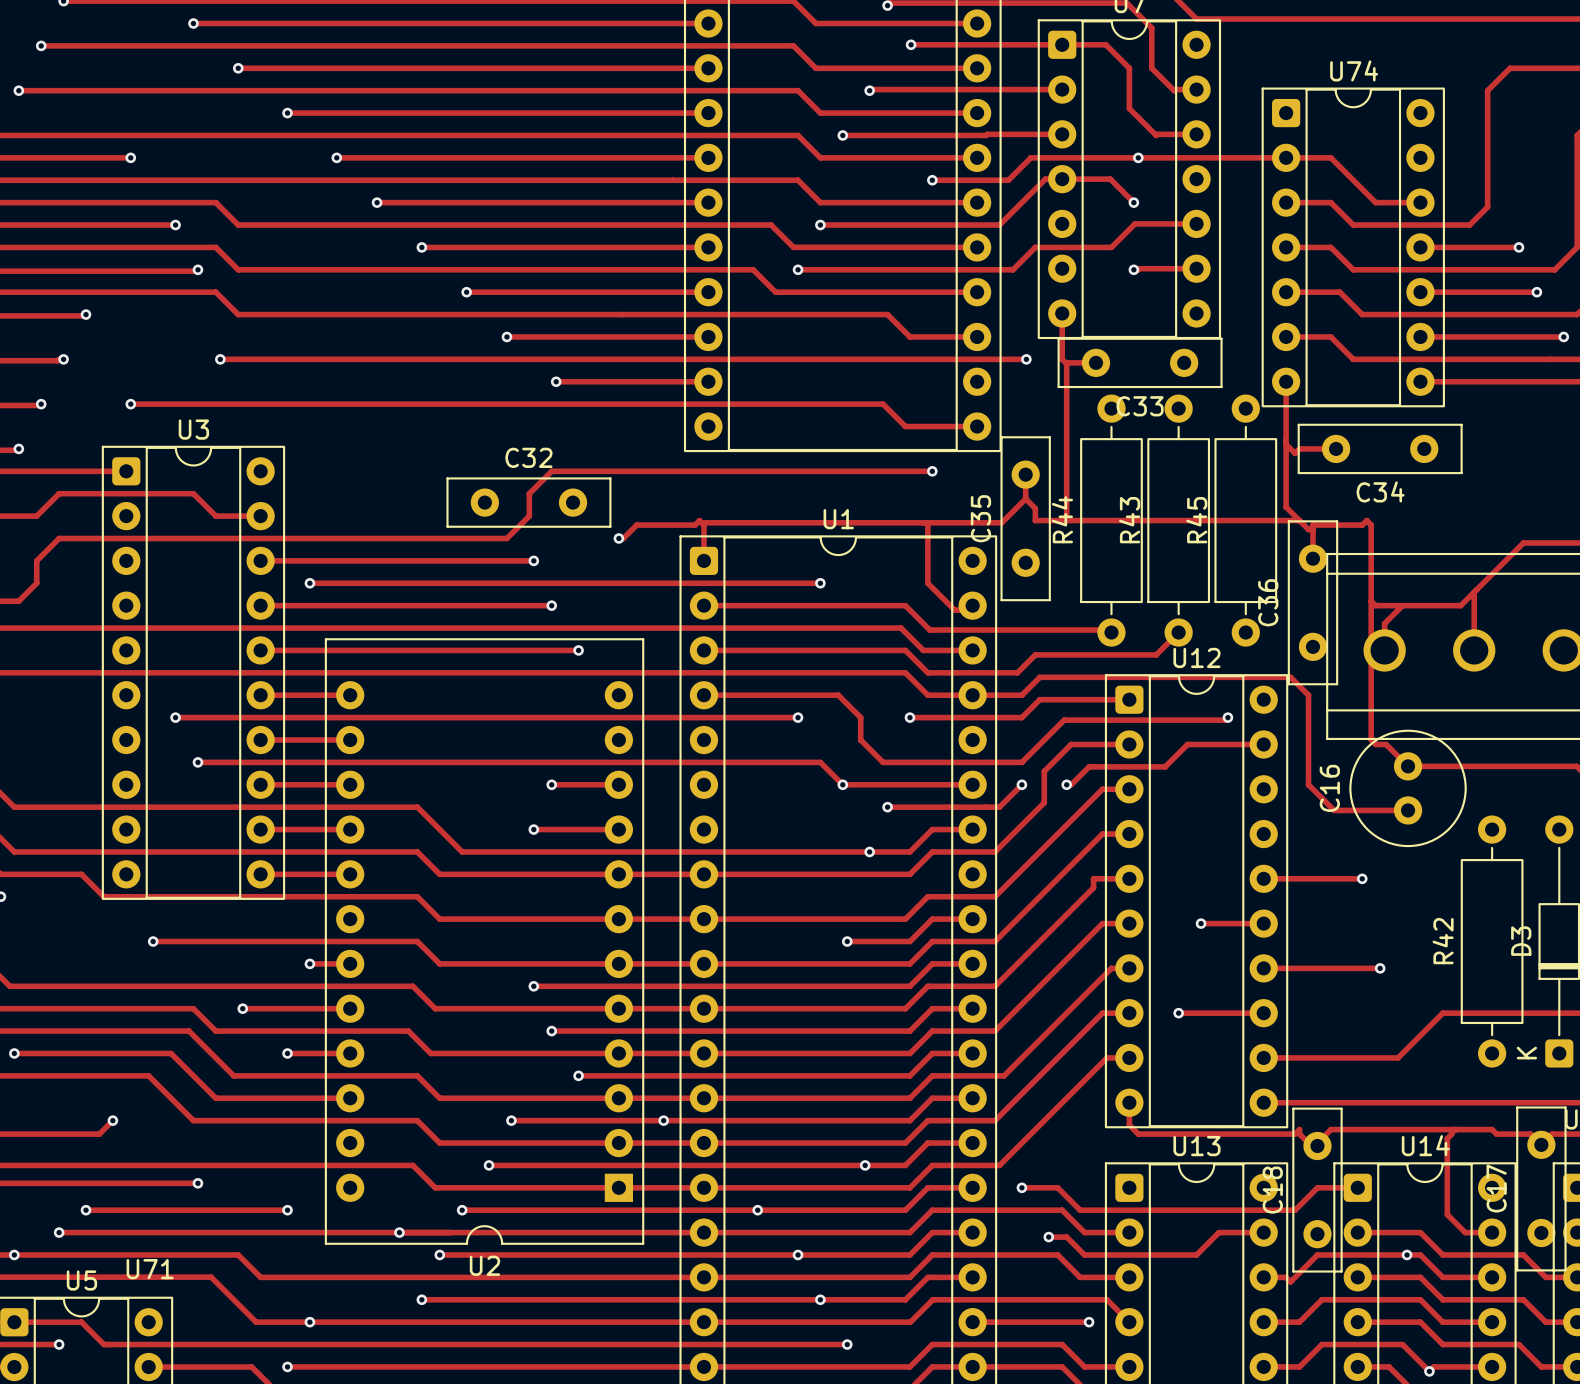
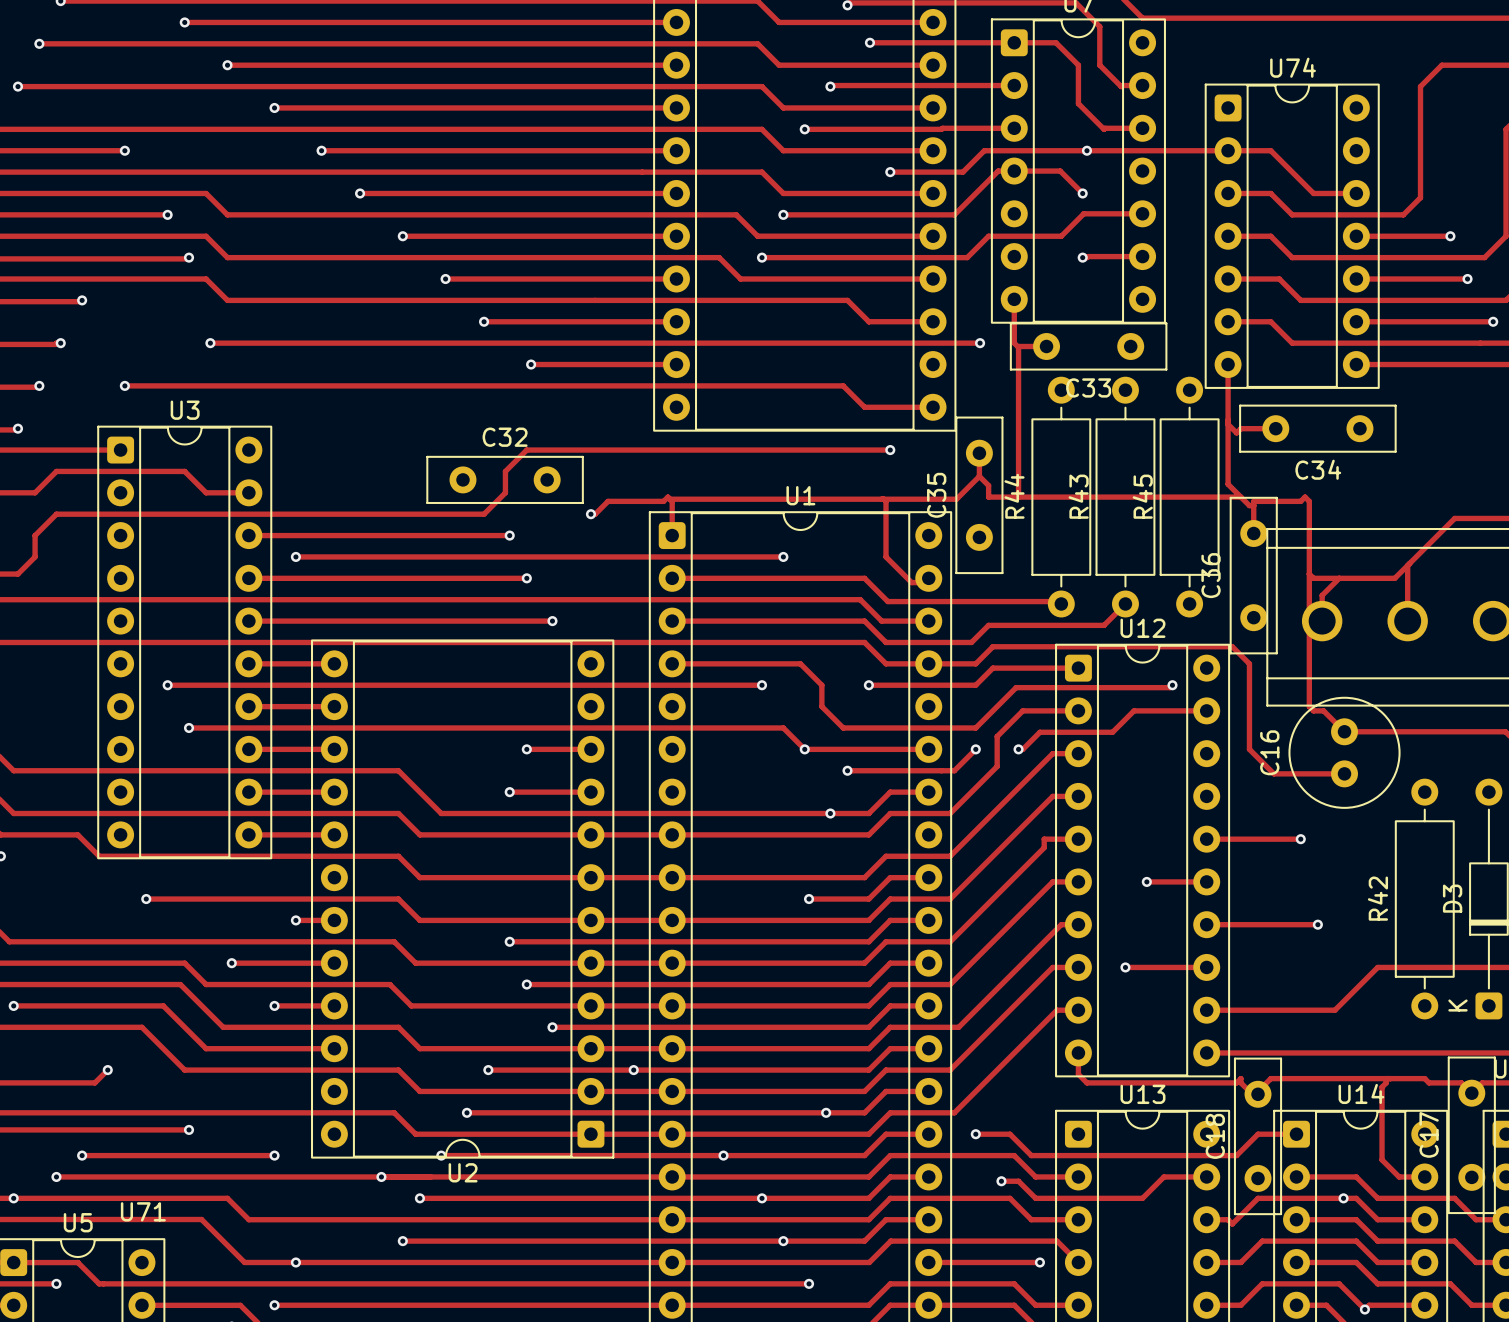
U2 footprint: [324, 638, 645, 1245] -> [311, 639, 615, 1159]
U2 name position: U2 (484, 1265) -> U2 (463, 1172)

